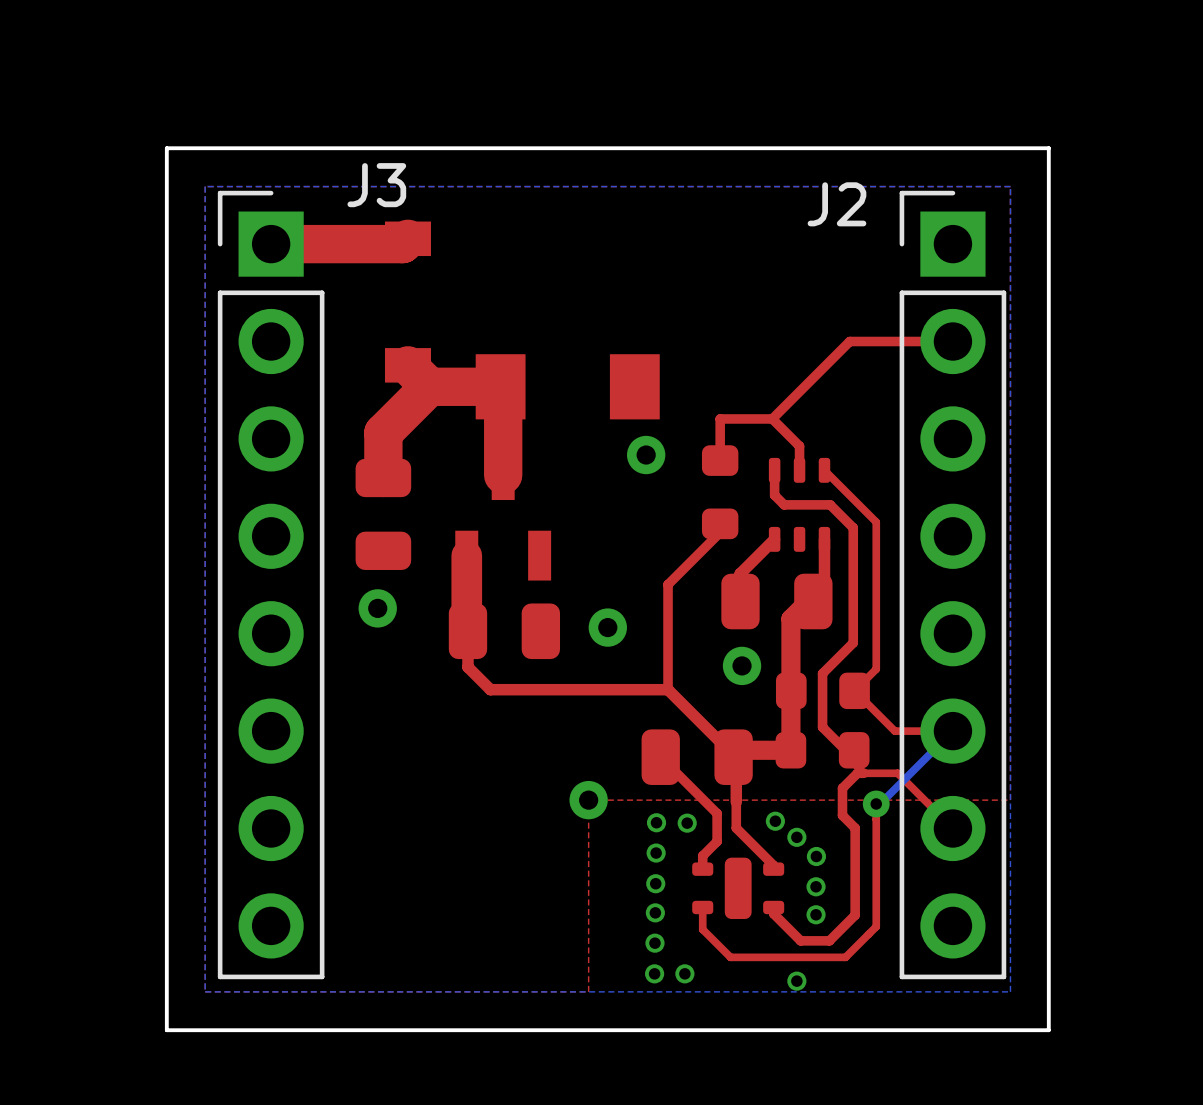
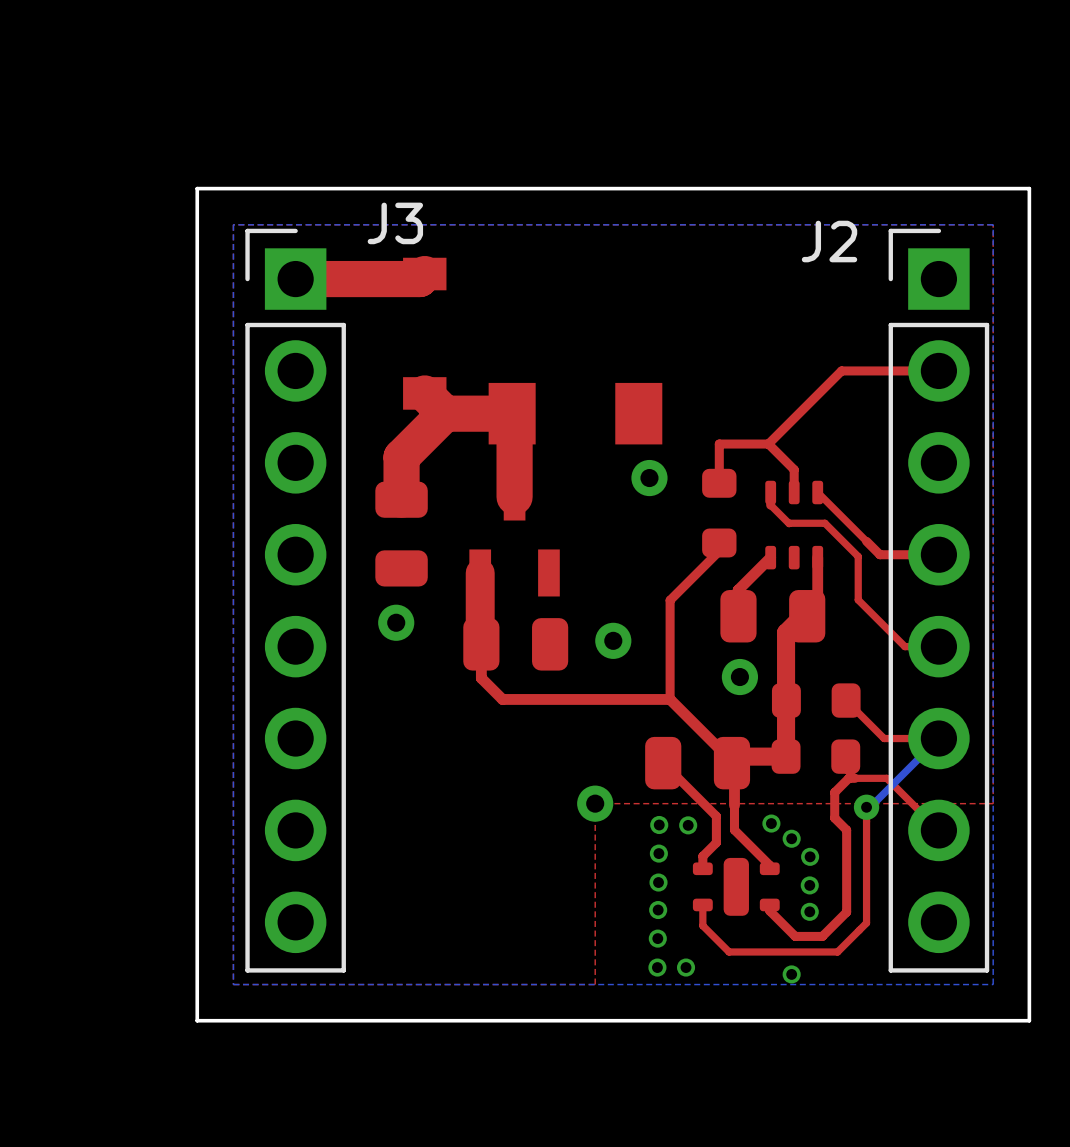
top track: (774, 483) (774, 495) (784, 504) (830, 504) (853, 527) (853, 642) (822, 673) (822, 727) (845, 750) (854, 750) -> (770, 505) (789, 523)
top track: none -> (789, 523) (824, 523) (858, 556) (858, 599) (904, 646) (938, 646)
top track: (876, 522) (876, 669) (854, 690) -> (866, 541) (879, 554) (938, 554)

